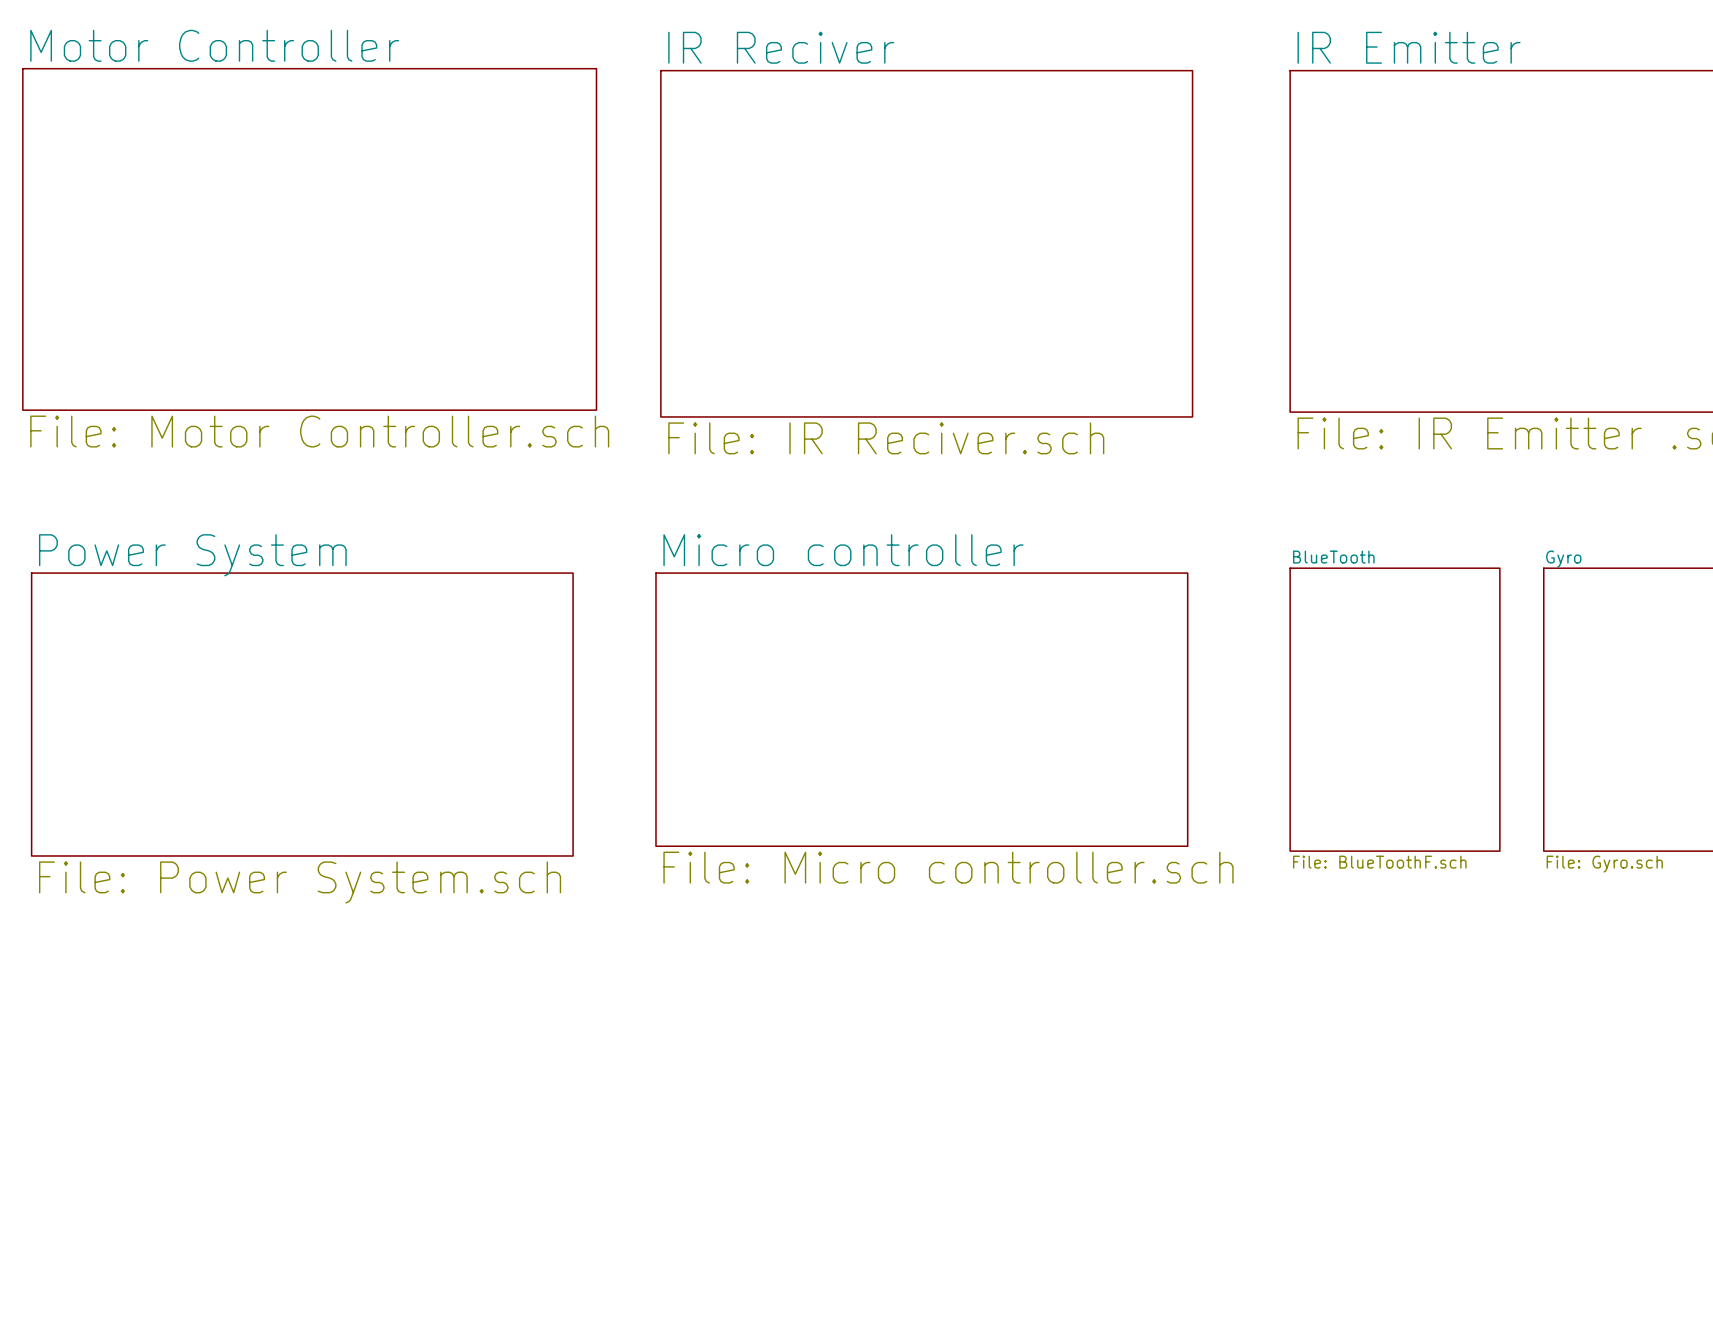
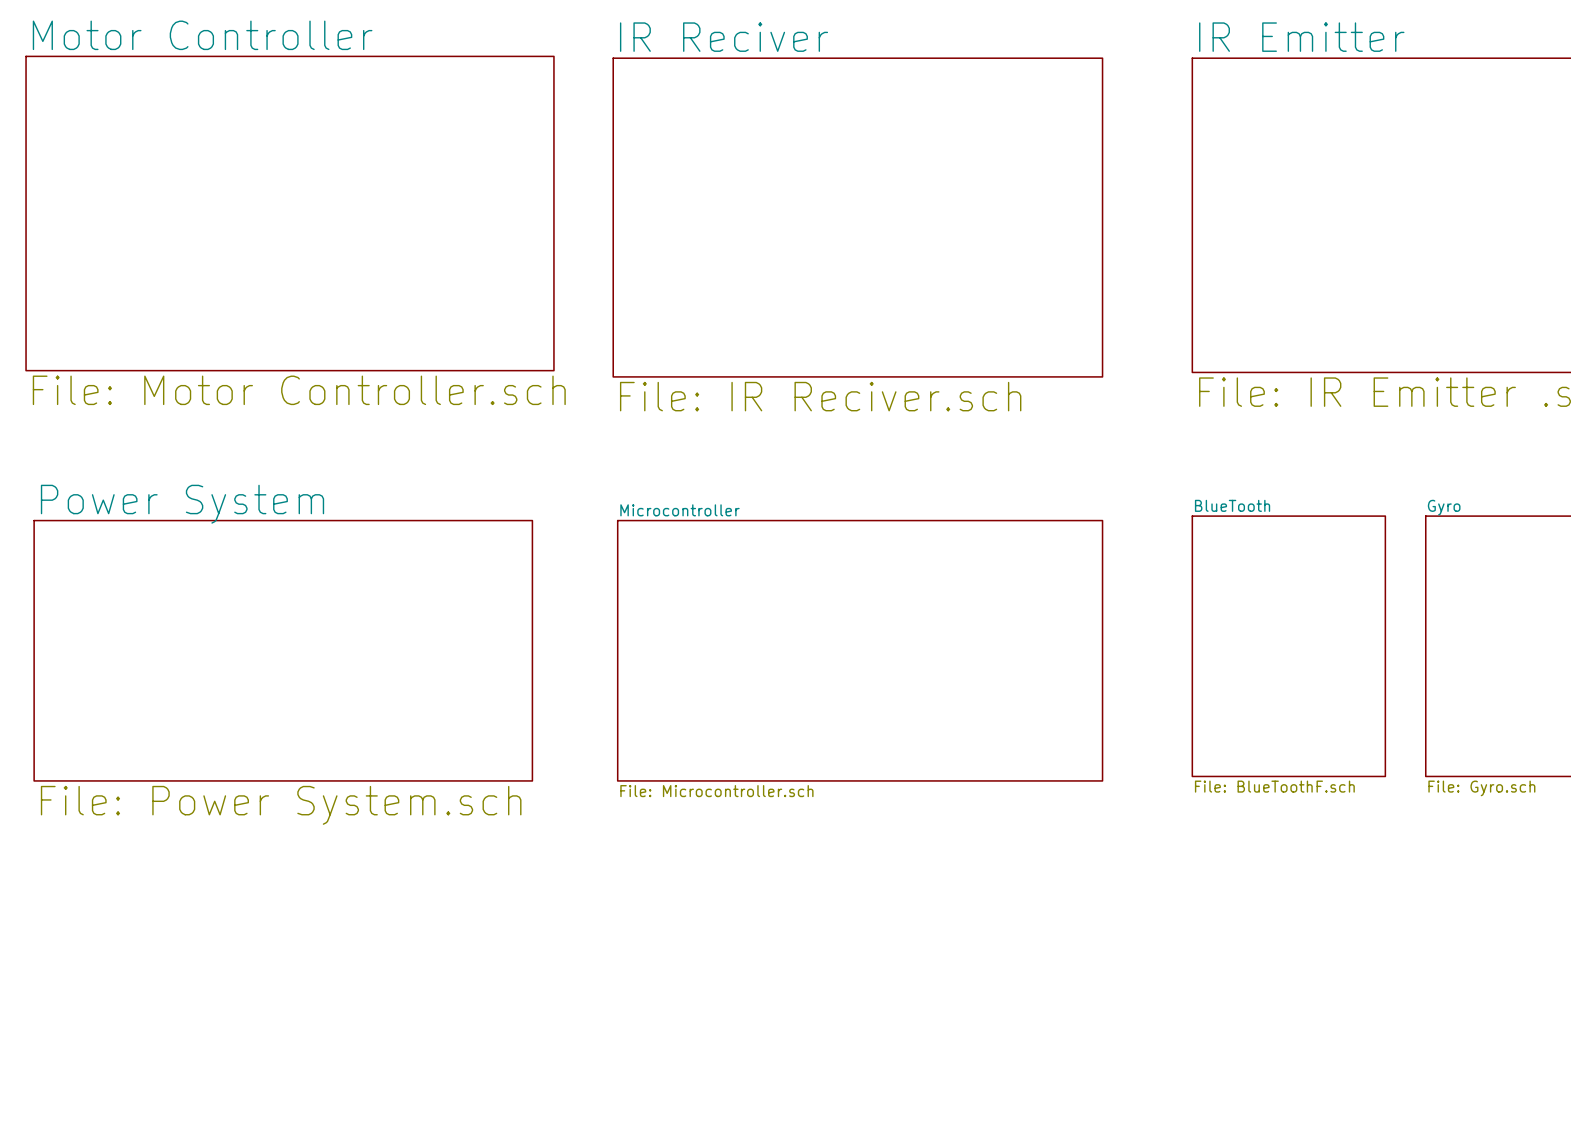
sheet Micro controller: File: Micro controller.sch (921, 709) -> none
sheet Microcontroller: none -> File: Microcontroller.sch (860, 650)

